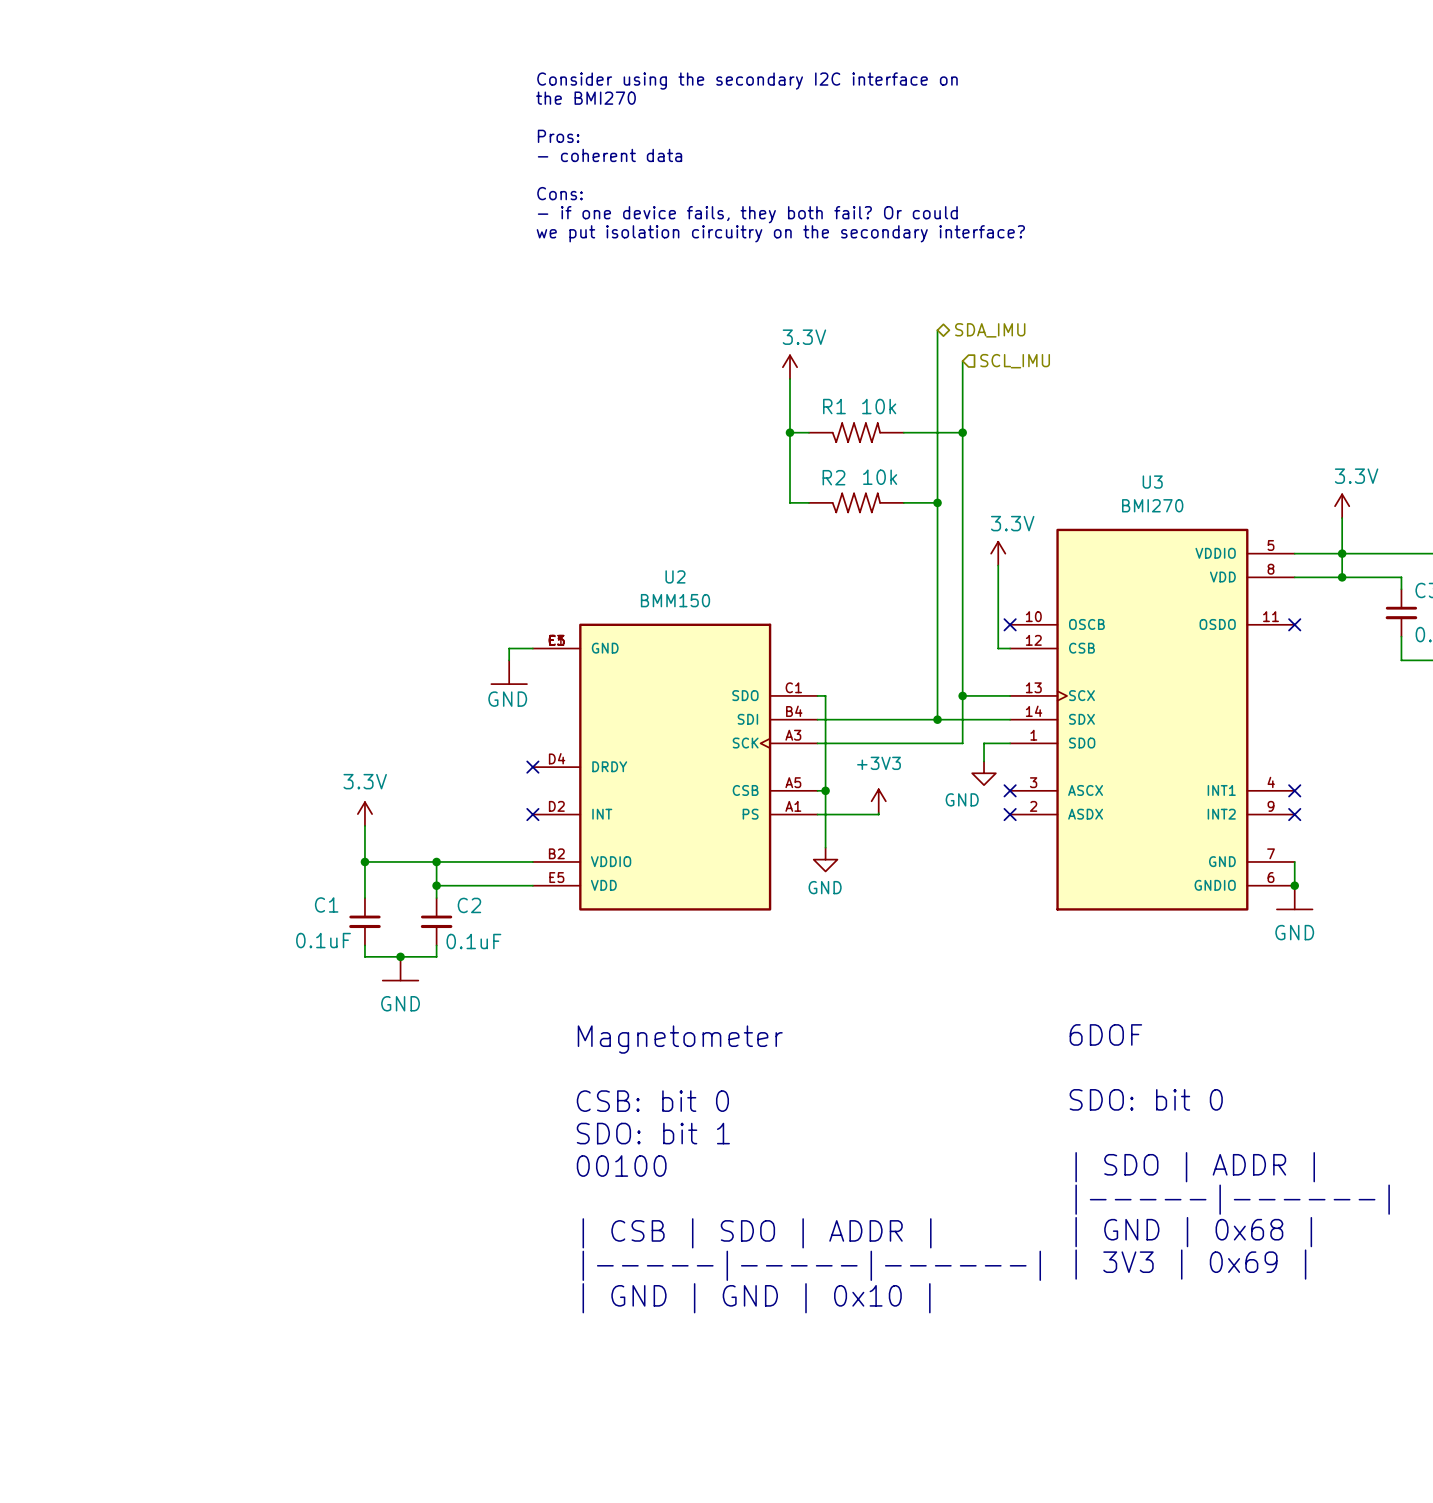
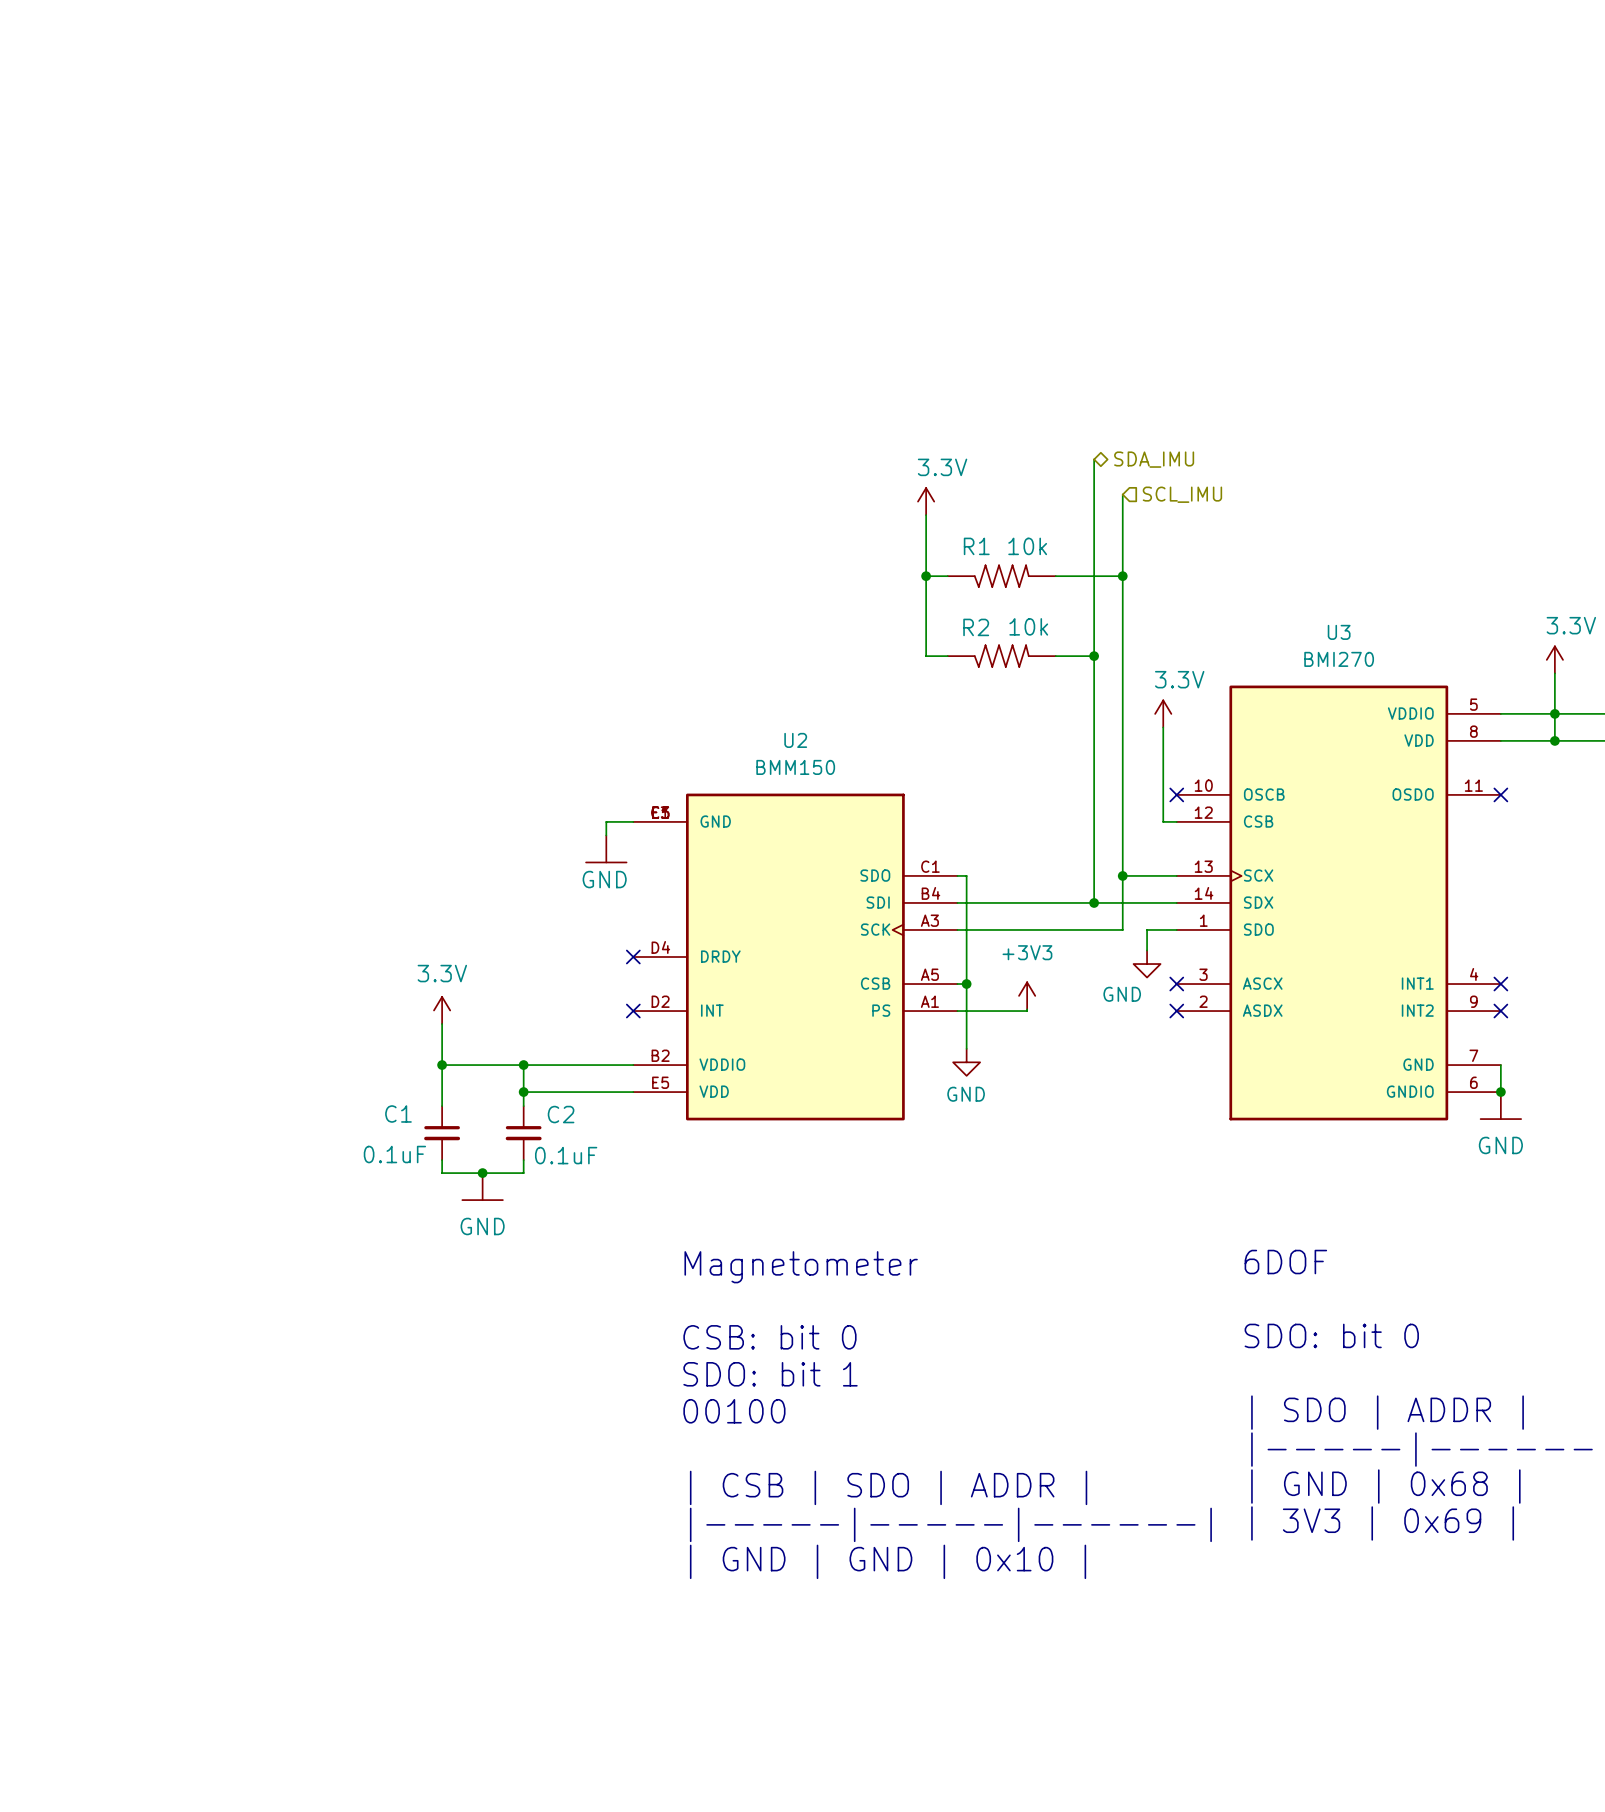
text: Consider using the secondary I2C interface on (747, 81) -> none
text: the BMI270 (585, 98) -> none
text: Pros: (558, 136) -> none
text: - coherent data (609, 155) -> none
text: Cons: (560, 193) -> none
text: - if one device fails, they both fail? Or could (747, 214) -> none
text: we put isolation circuitry on the secondary interface? (780, 233) -> none

